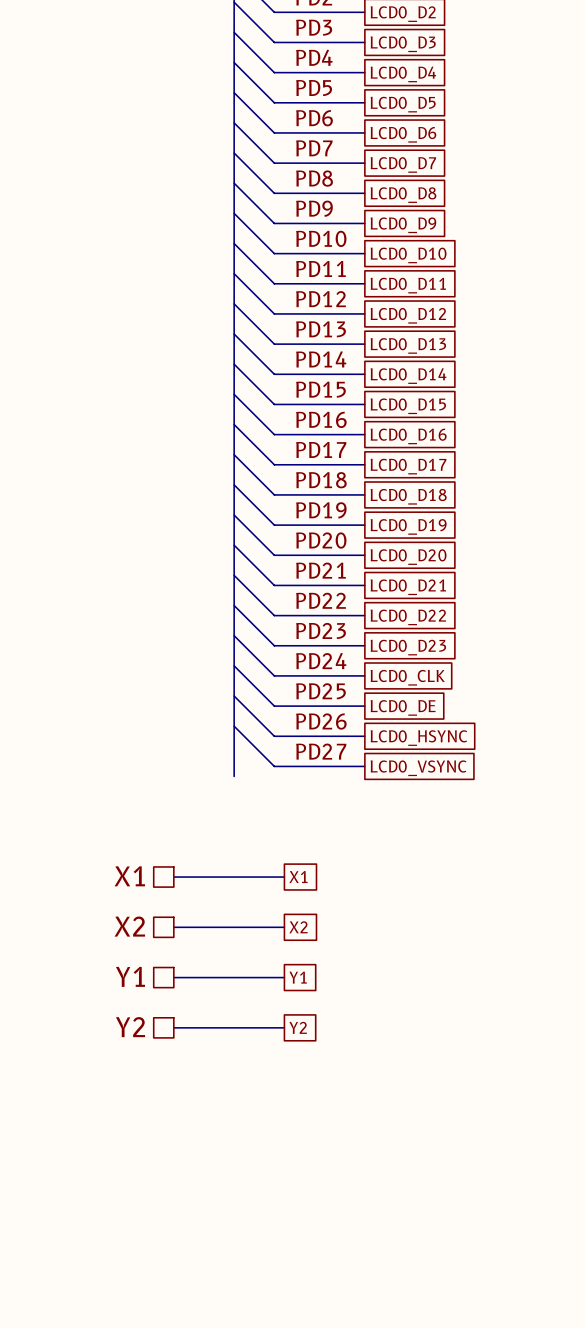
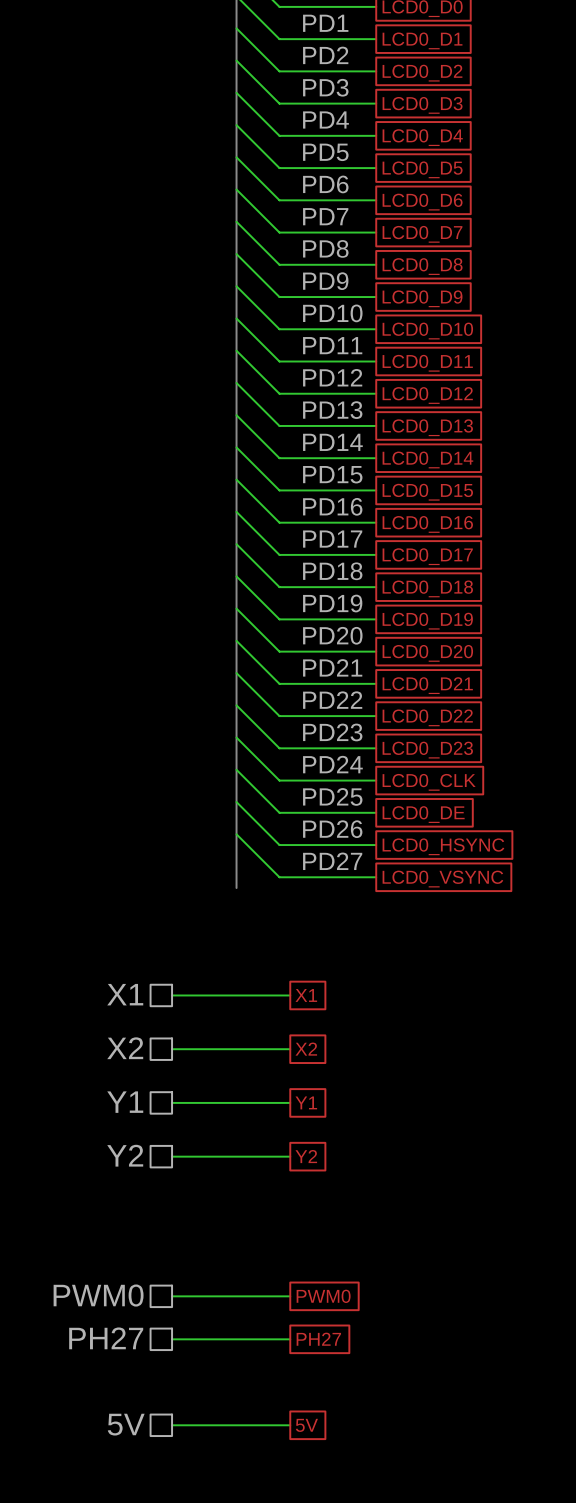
hierarchical label: none -> PWM0 (98, 1295)
wire: none -> (172, 1296) (290, 1296)
global label: none -> PWM0 (323, 1296)
hierarchical label: none -> PH27 (106, 1338)
wire: none -> (172, 1339) (290, 1339)
global label: none -> PH27 (318, 1339)
hierarchical label: none -> 5V (126, 1424)
wire: none -> (172, 1425) (290, 1425)
global label: none -> 5V (306, 1425)

